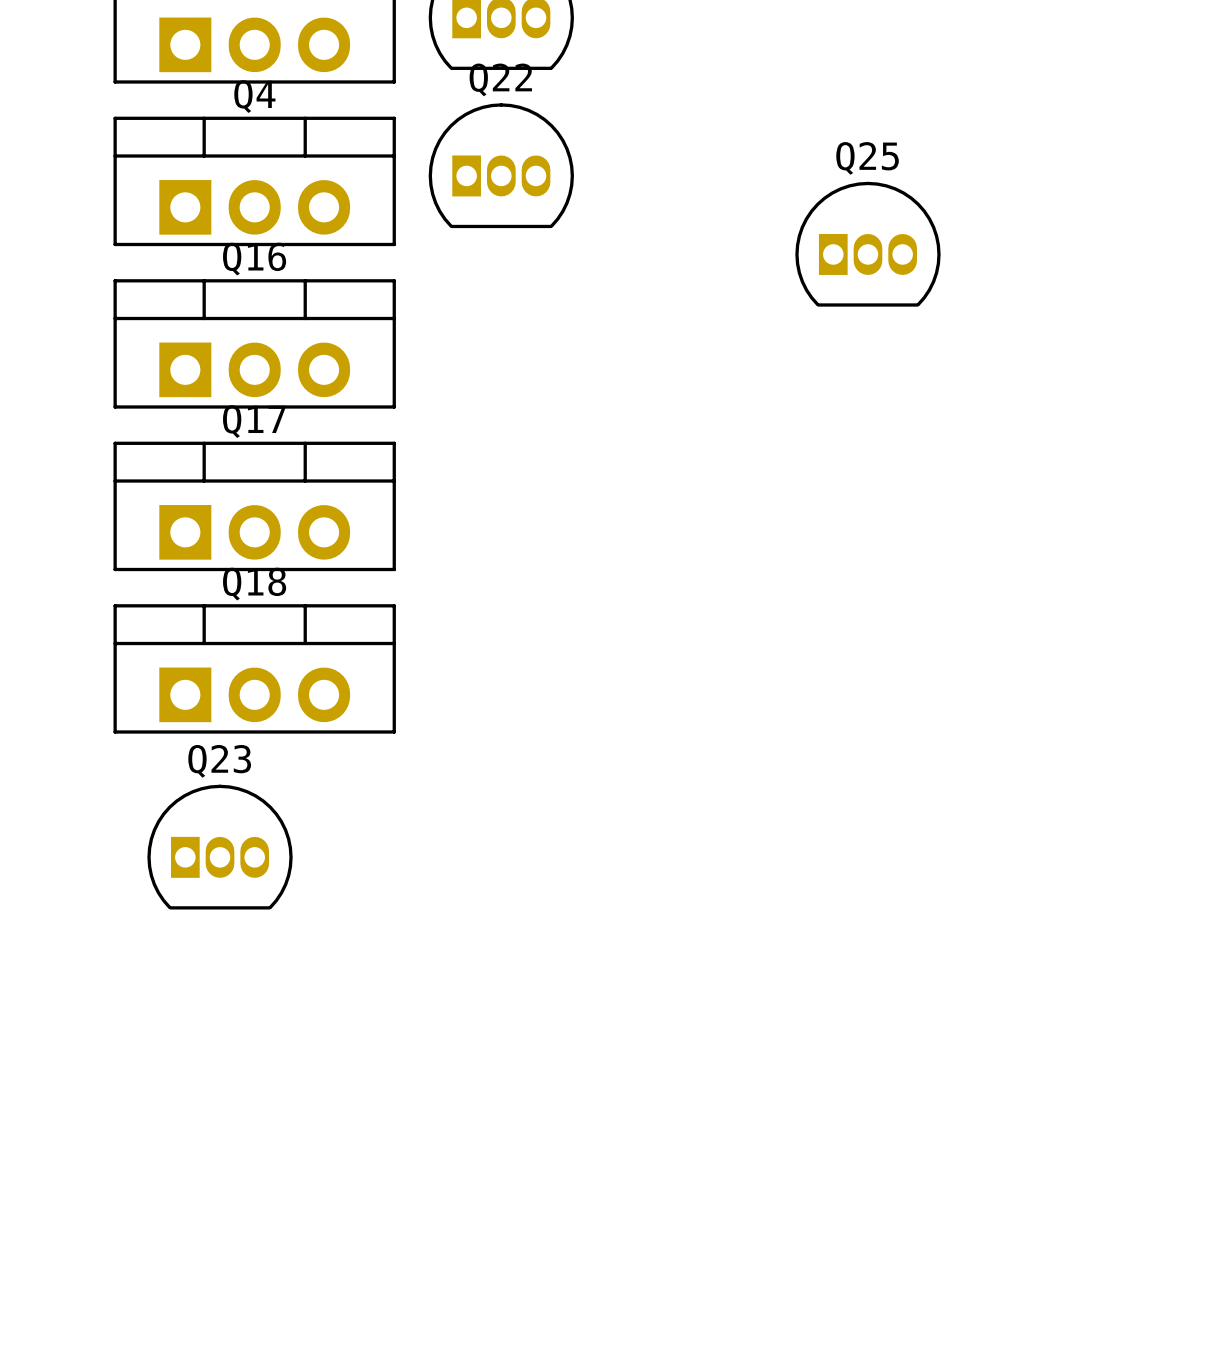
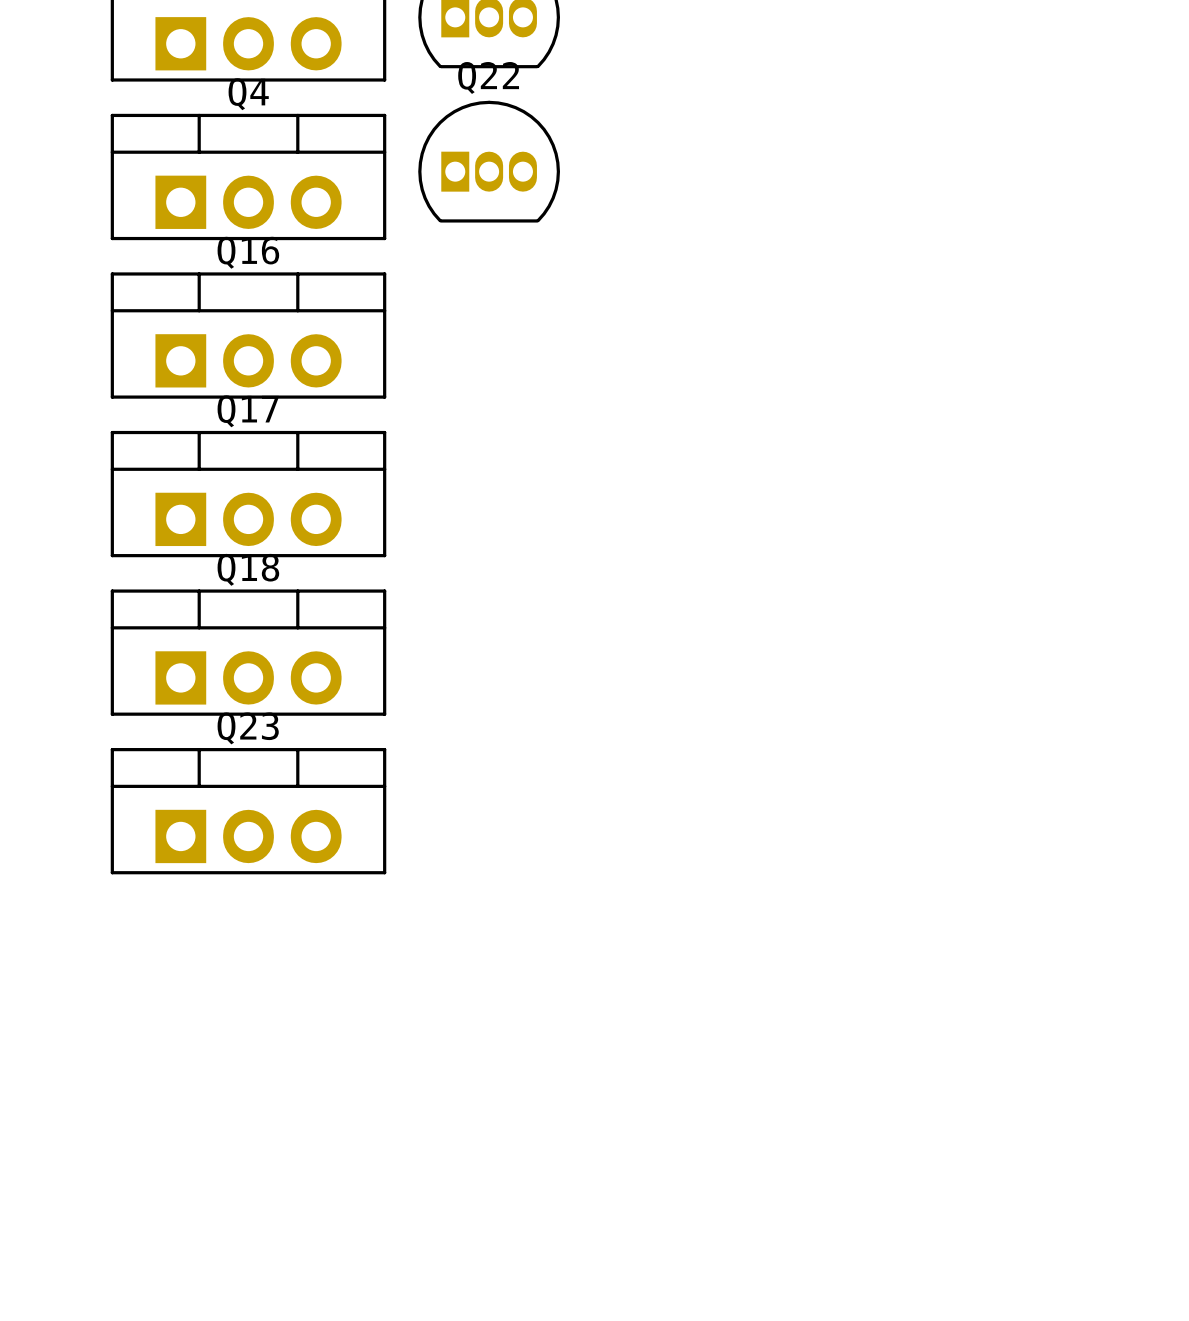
Q25: (867, 244) -> none
Q23 footprint: [147, 784, 293, 910] -> [110, 748, 387, 875]

